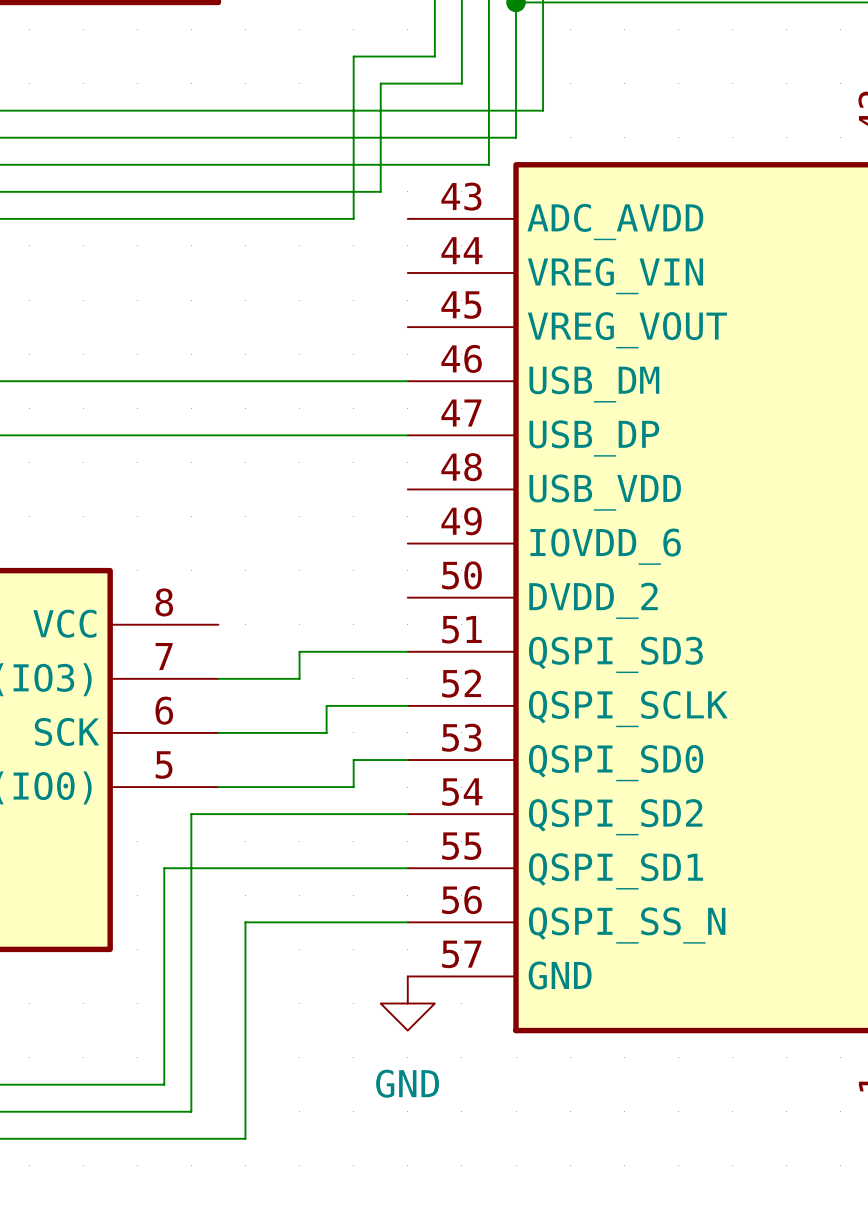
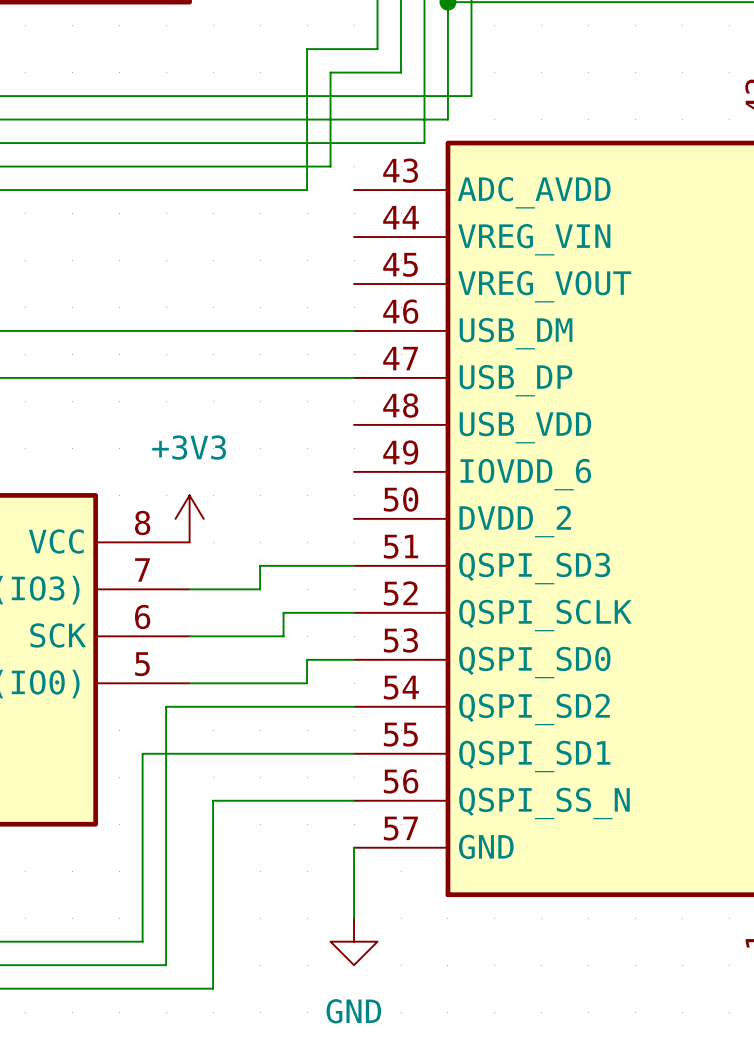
power symbol: none -> +3V3 (189, 518)
wire: none -> (354, 847) (354, 918)
power symbol position: GND (407, 1003) -> GND (354, 941)

